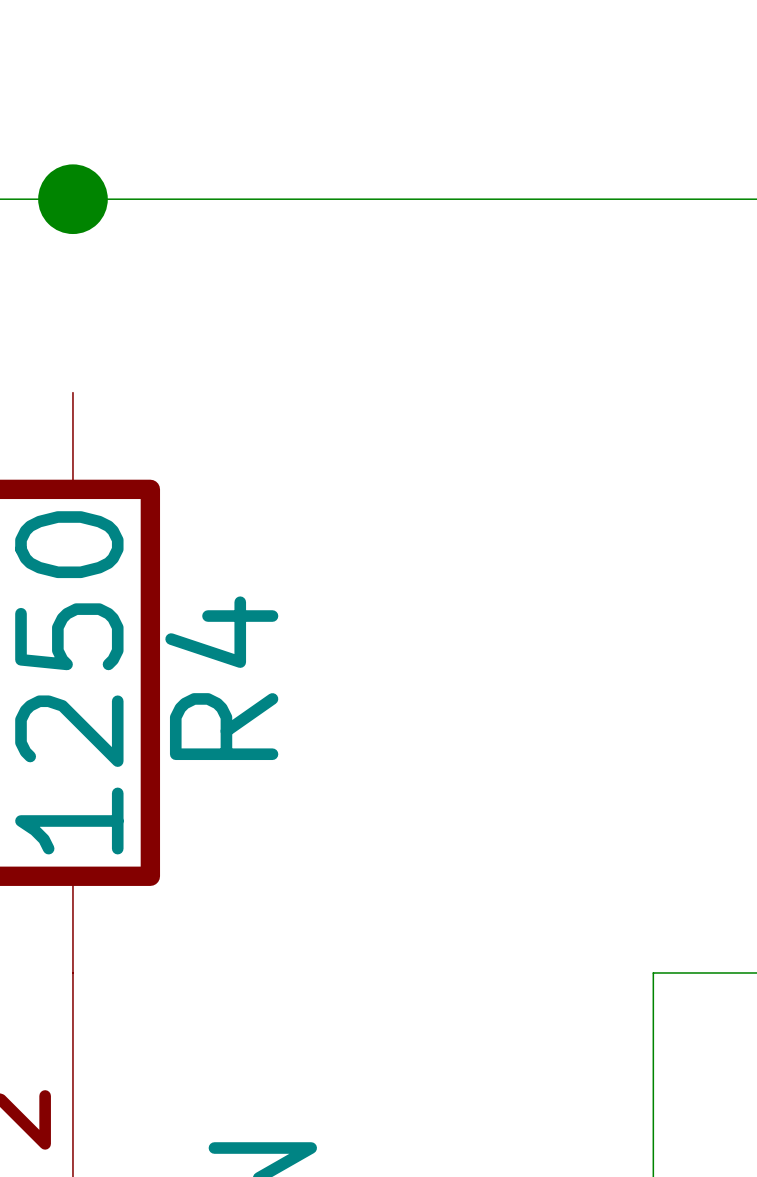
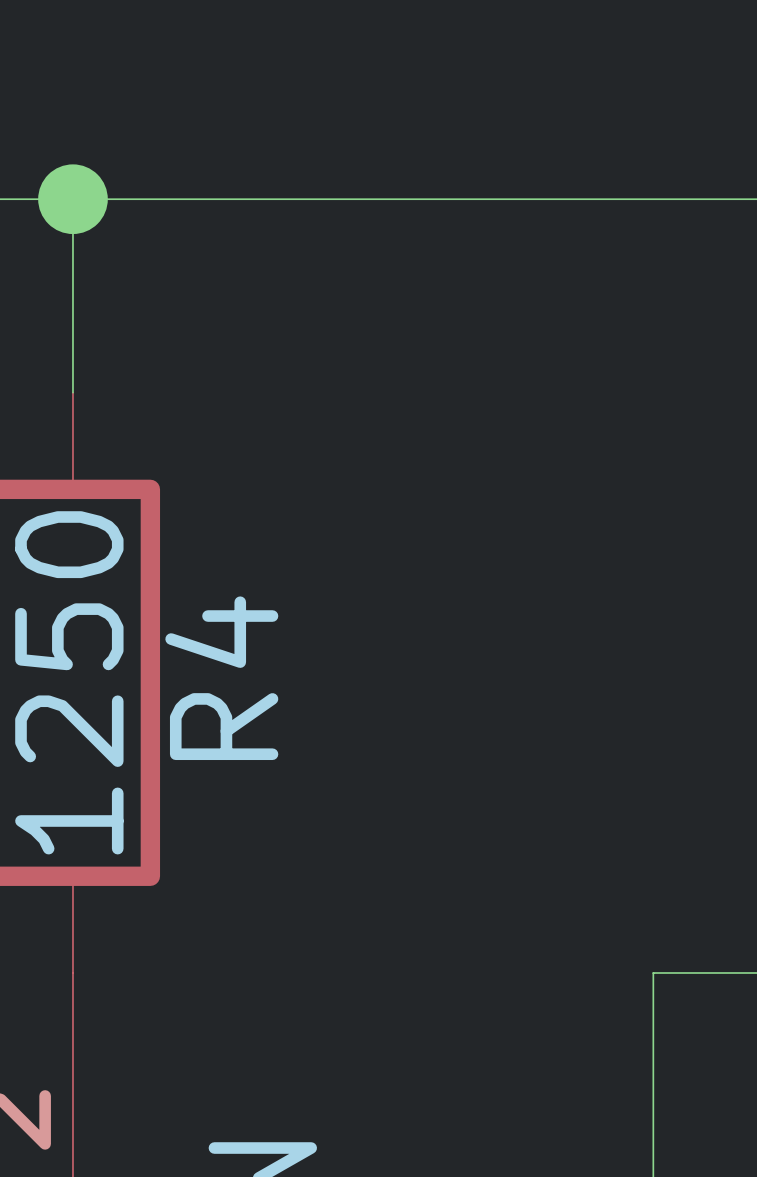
wire: none -> (72, 199) (72, 392)

